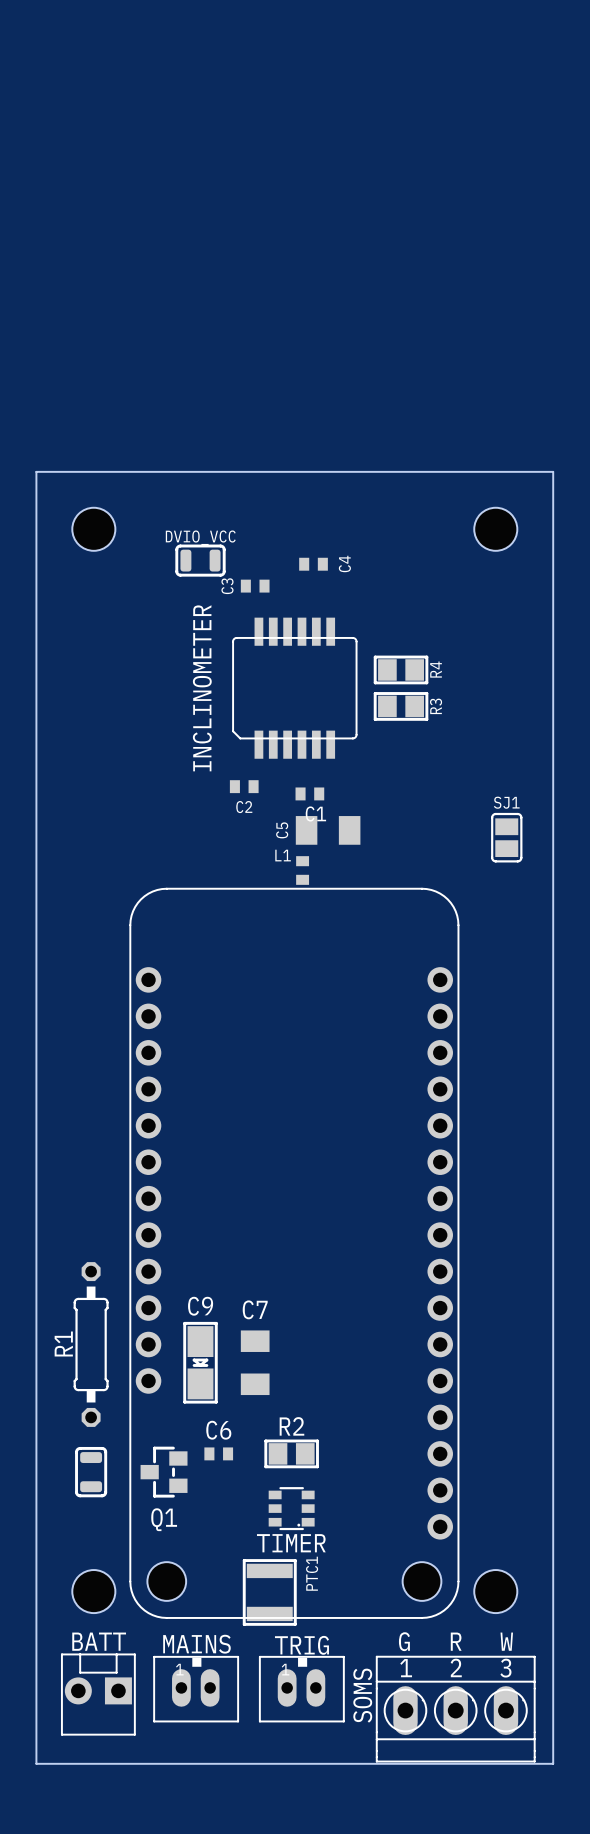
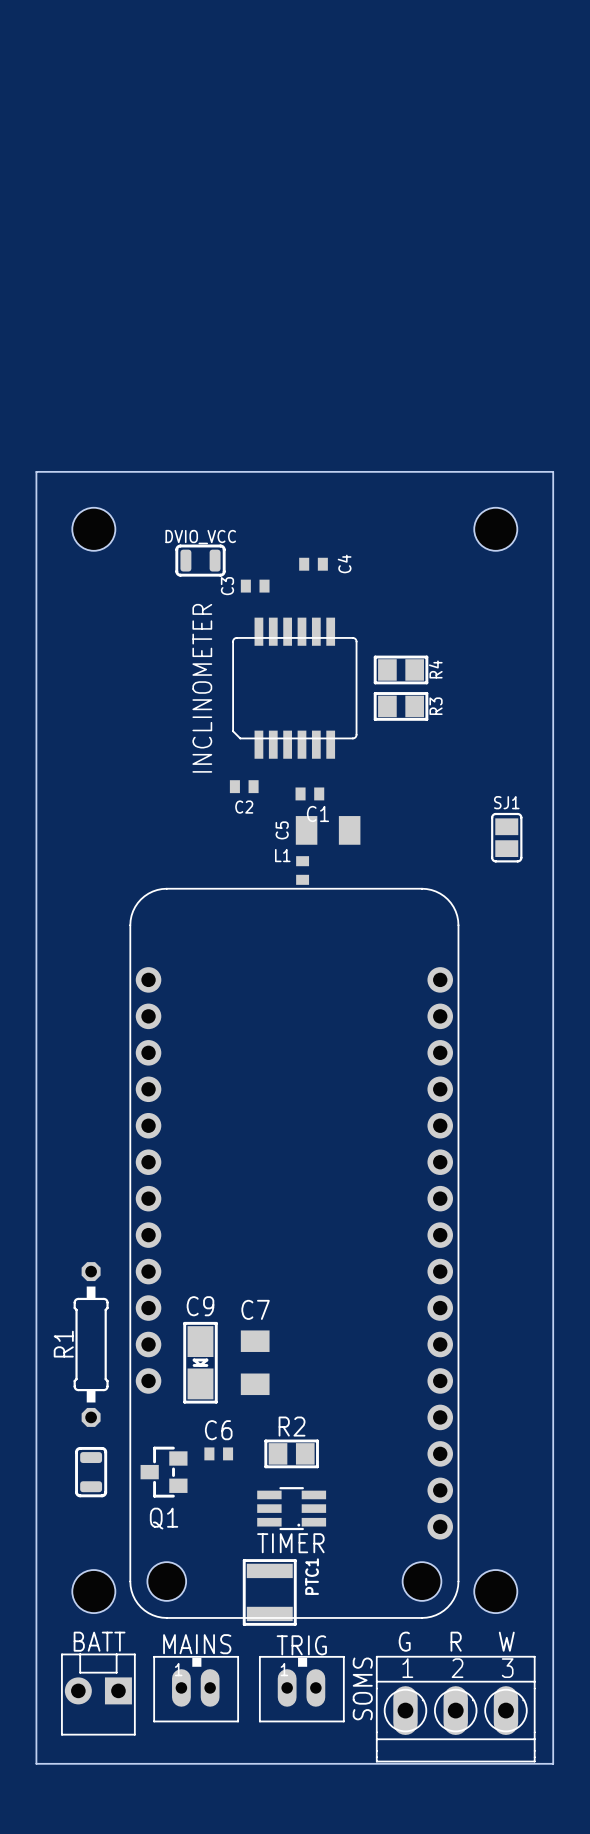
TIMER footprint: [268, 1487, 315, 1531] -> [257, 1487, 327, 1531]

